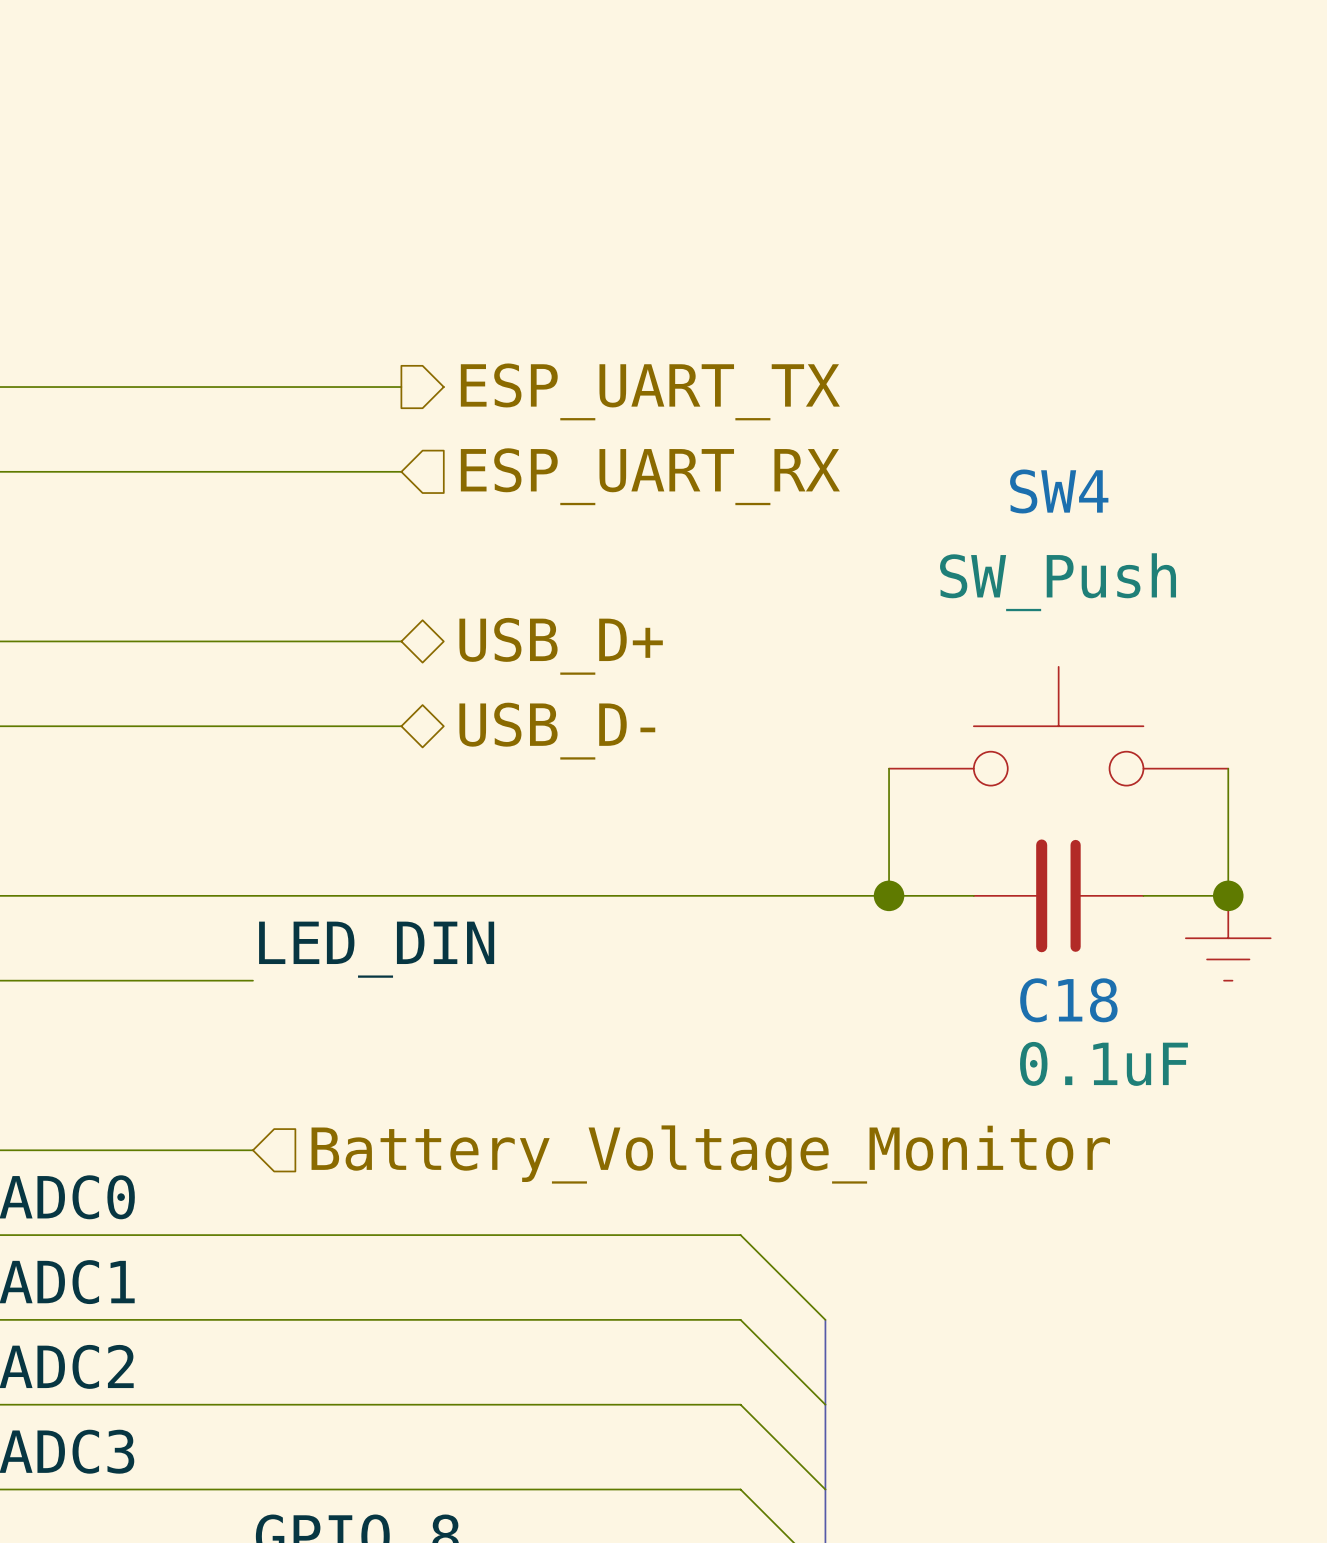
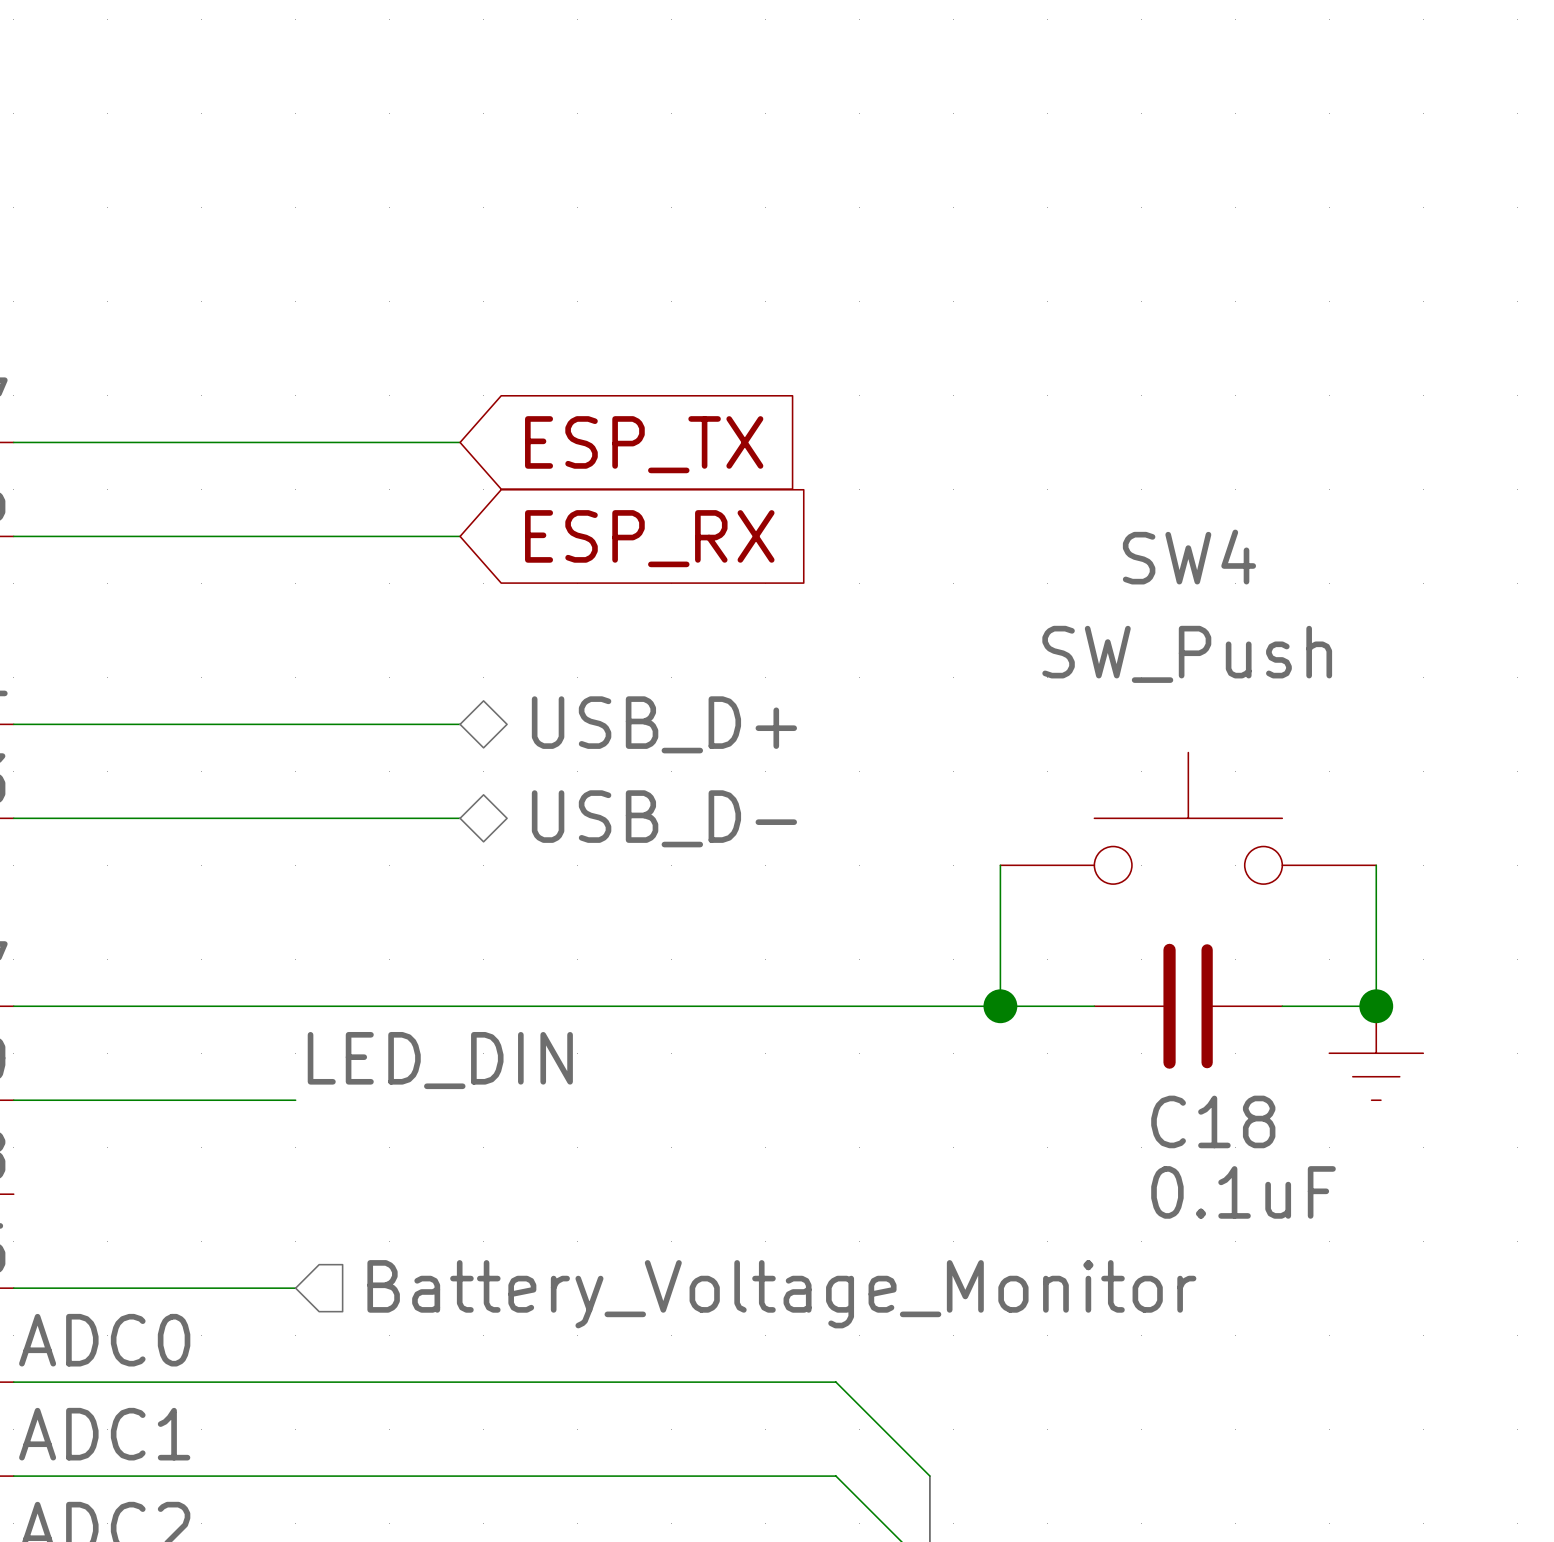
hierarchical label: ESP_UART_TX (650, 391) -> none
global label: none -> ESP_TX (644, 444)
hierarchical label: ESP_UART_RX (650, 476) -> none
global label: none -> ESP_RX (649, 538)

